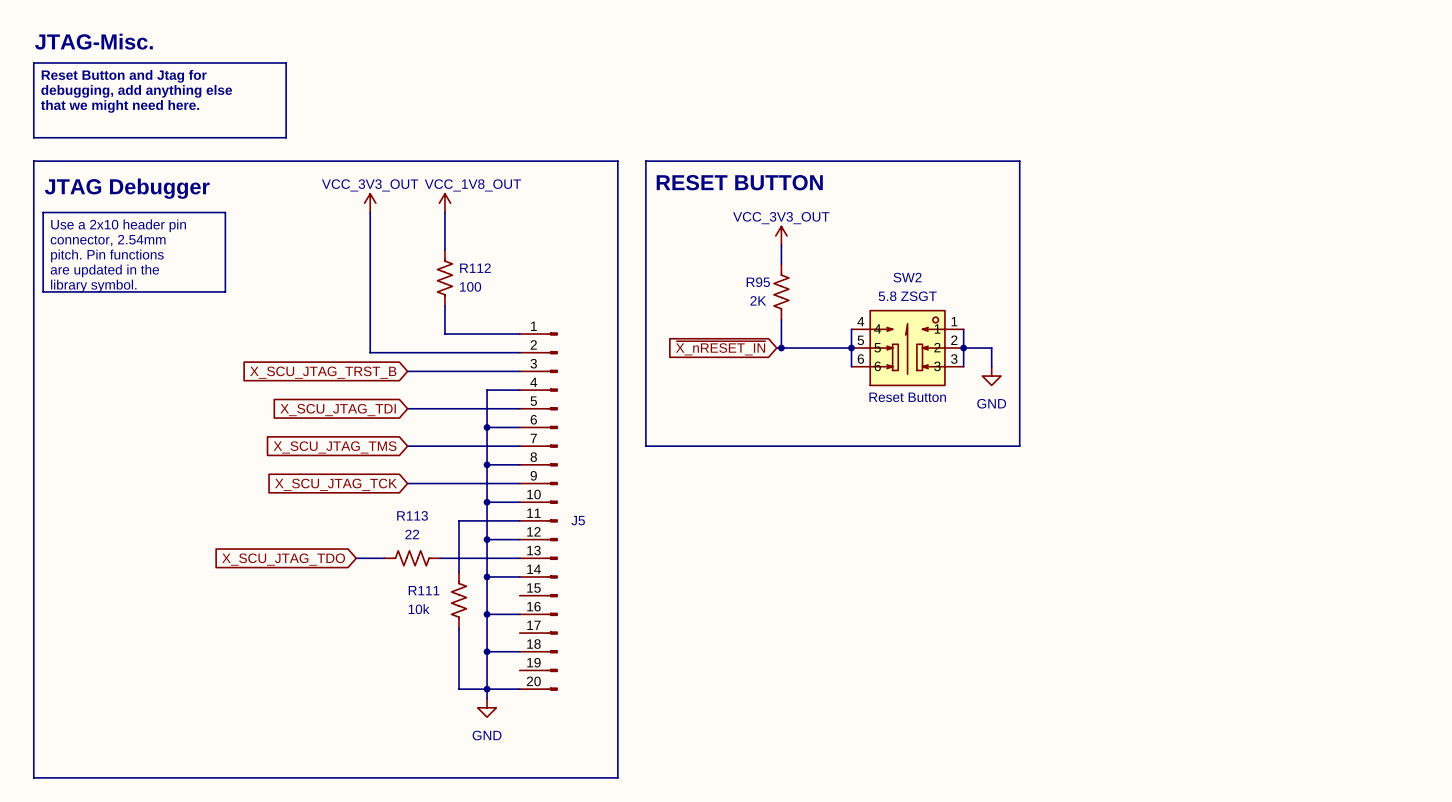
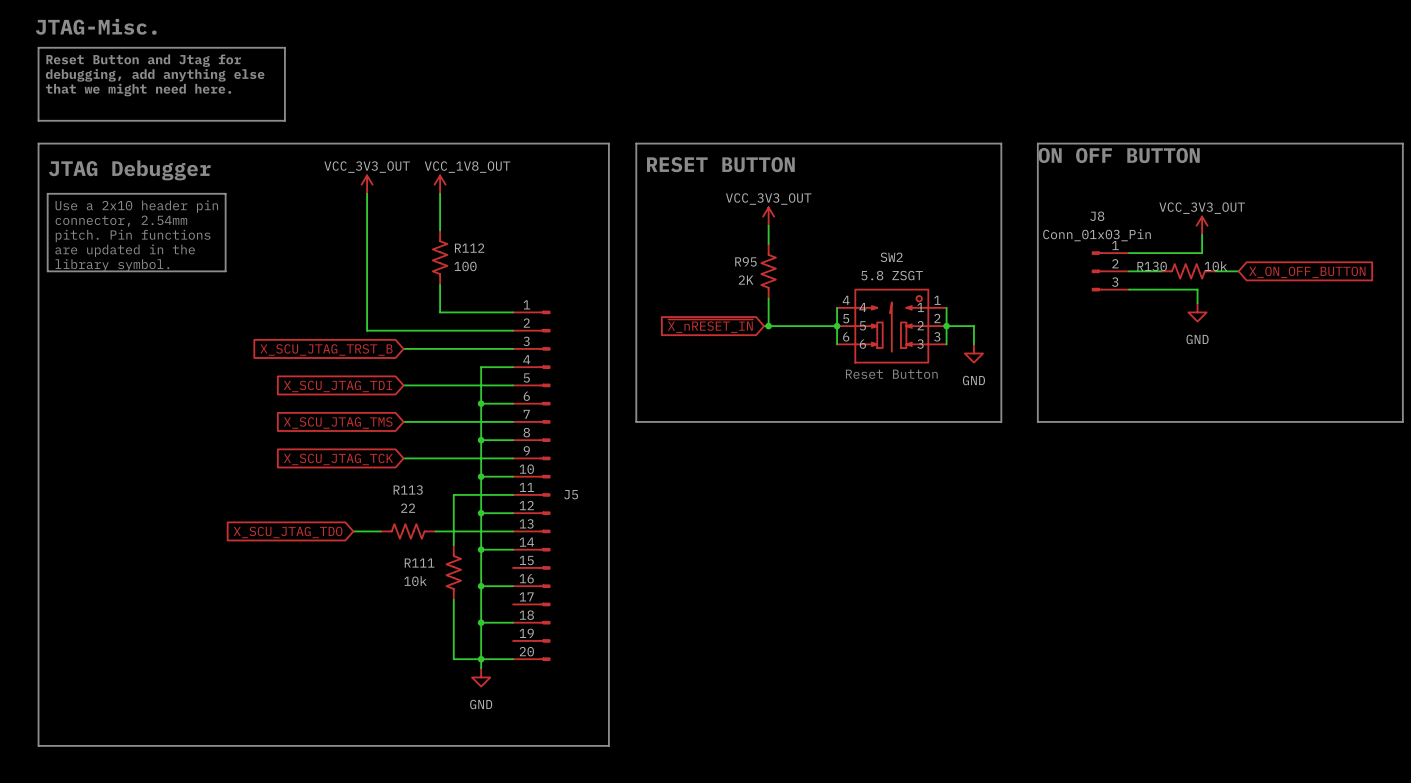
line: none -> (1037, 143) (1402, 143) (1402, 421) (1037, 421) (1037, 143)
text: none -> ON OFF BUTTON (1119, 155)
power symbol: none -> VCC_3V3_OUT (1202, 225)
wire: none -> (1202, 234) (1202, 253) (1129, 253)
J8: none -> Conn_01x03_Pin (1110, 271)
wire: none -> (1129, 271) (1161, 271)
R130: none -> 10k (1188, 271)
wire: none -> (1215, 271) (1238, 271)
global label: none -> X_ON_OFF_BUTTON (1307, 272)
wire: none -> (1129, 289) (1197, 289) (1197, 303)
power symbol: none -> GND (1197, 312)

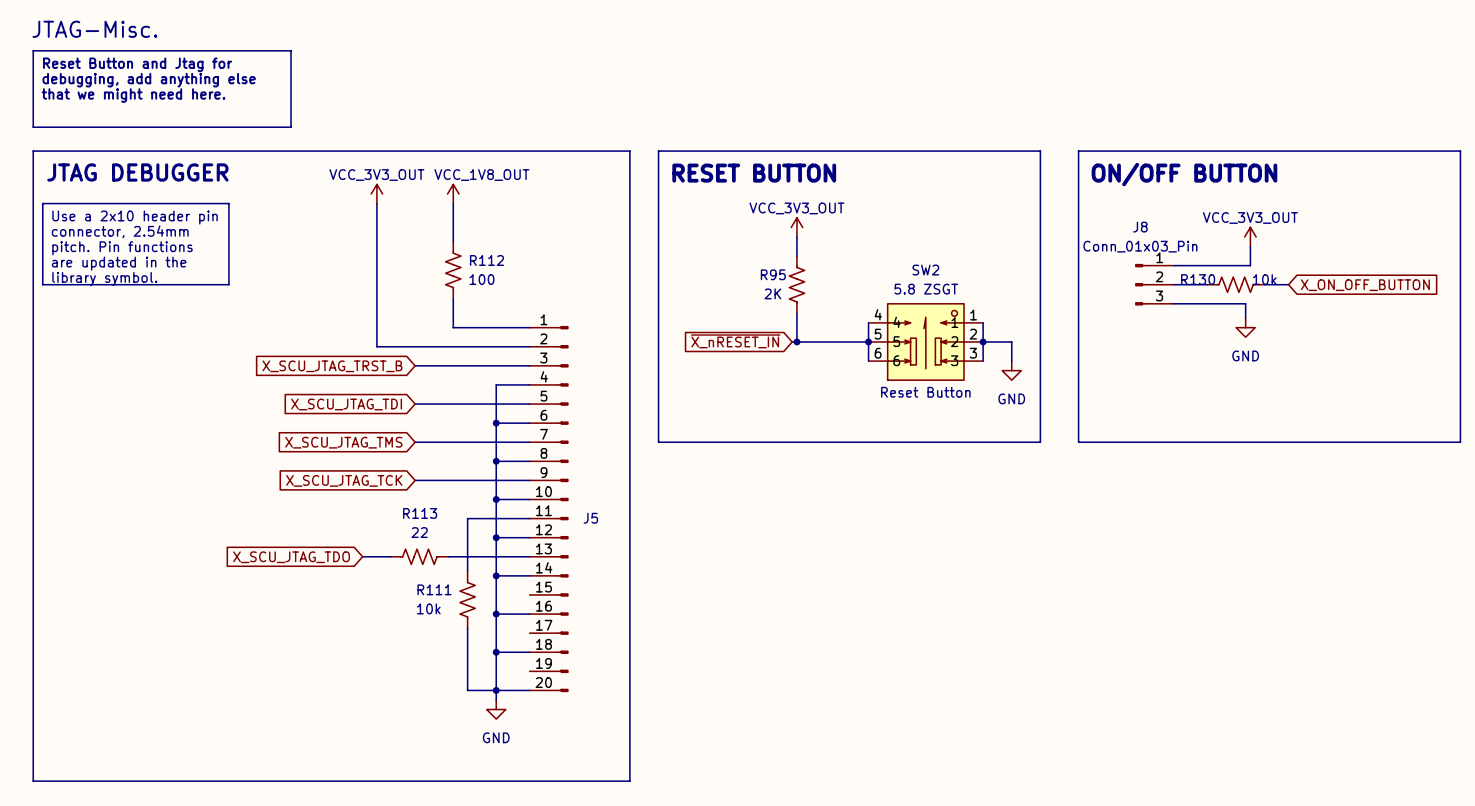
text: ON OFF BUTTON (1119, 155) -> ON/OFF BUTTON (1184, 174)
text: none -> JTAG DEBUGGER (137, 172)
text: JTAG Debugger (129, 170) -> none

